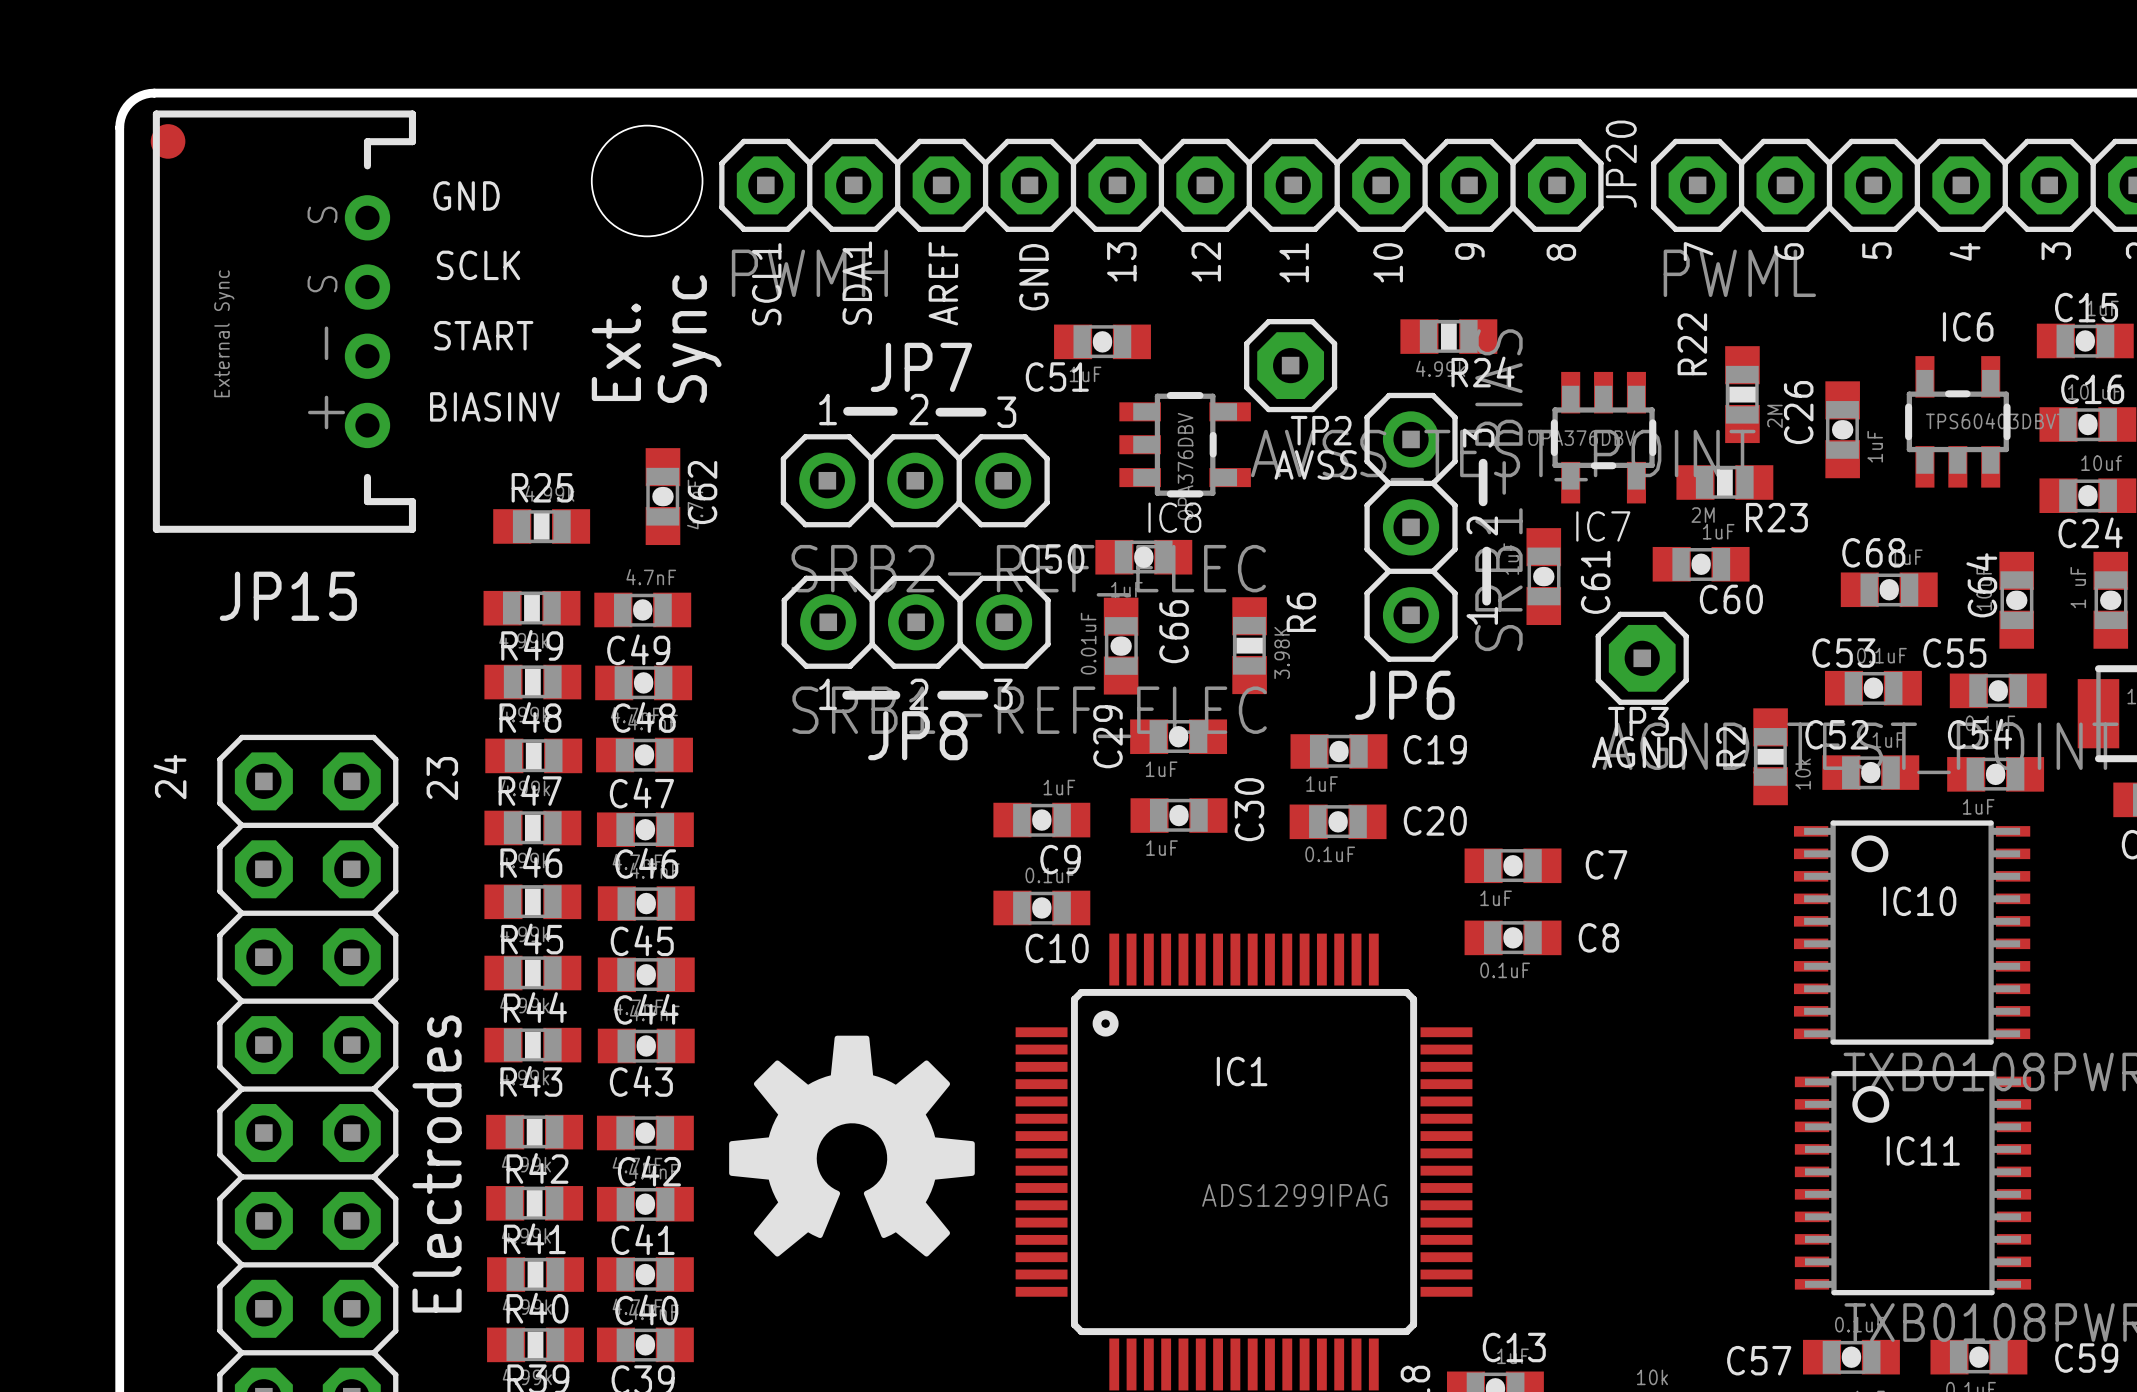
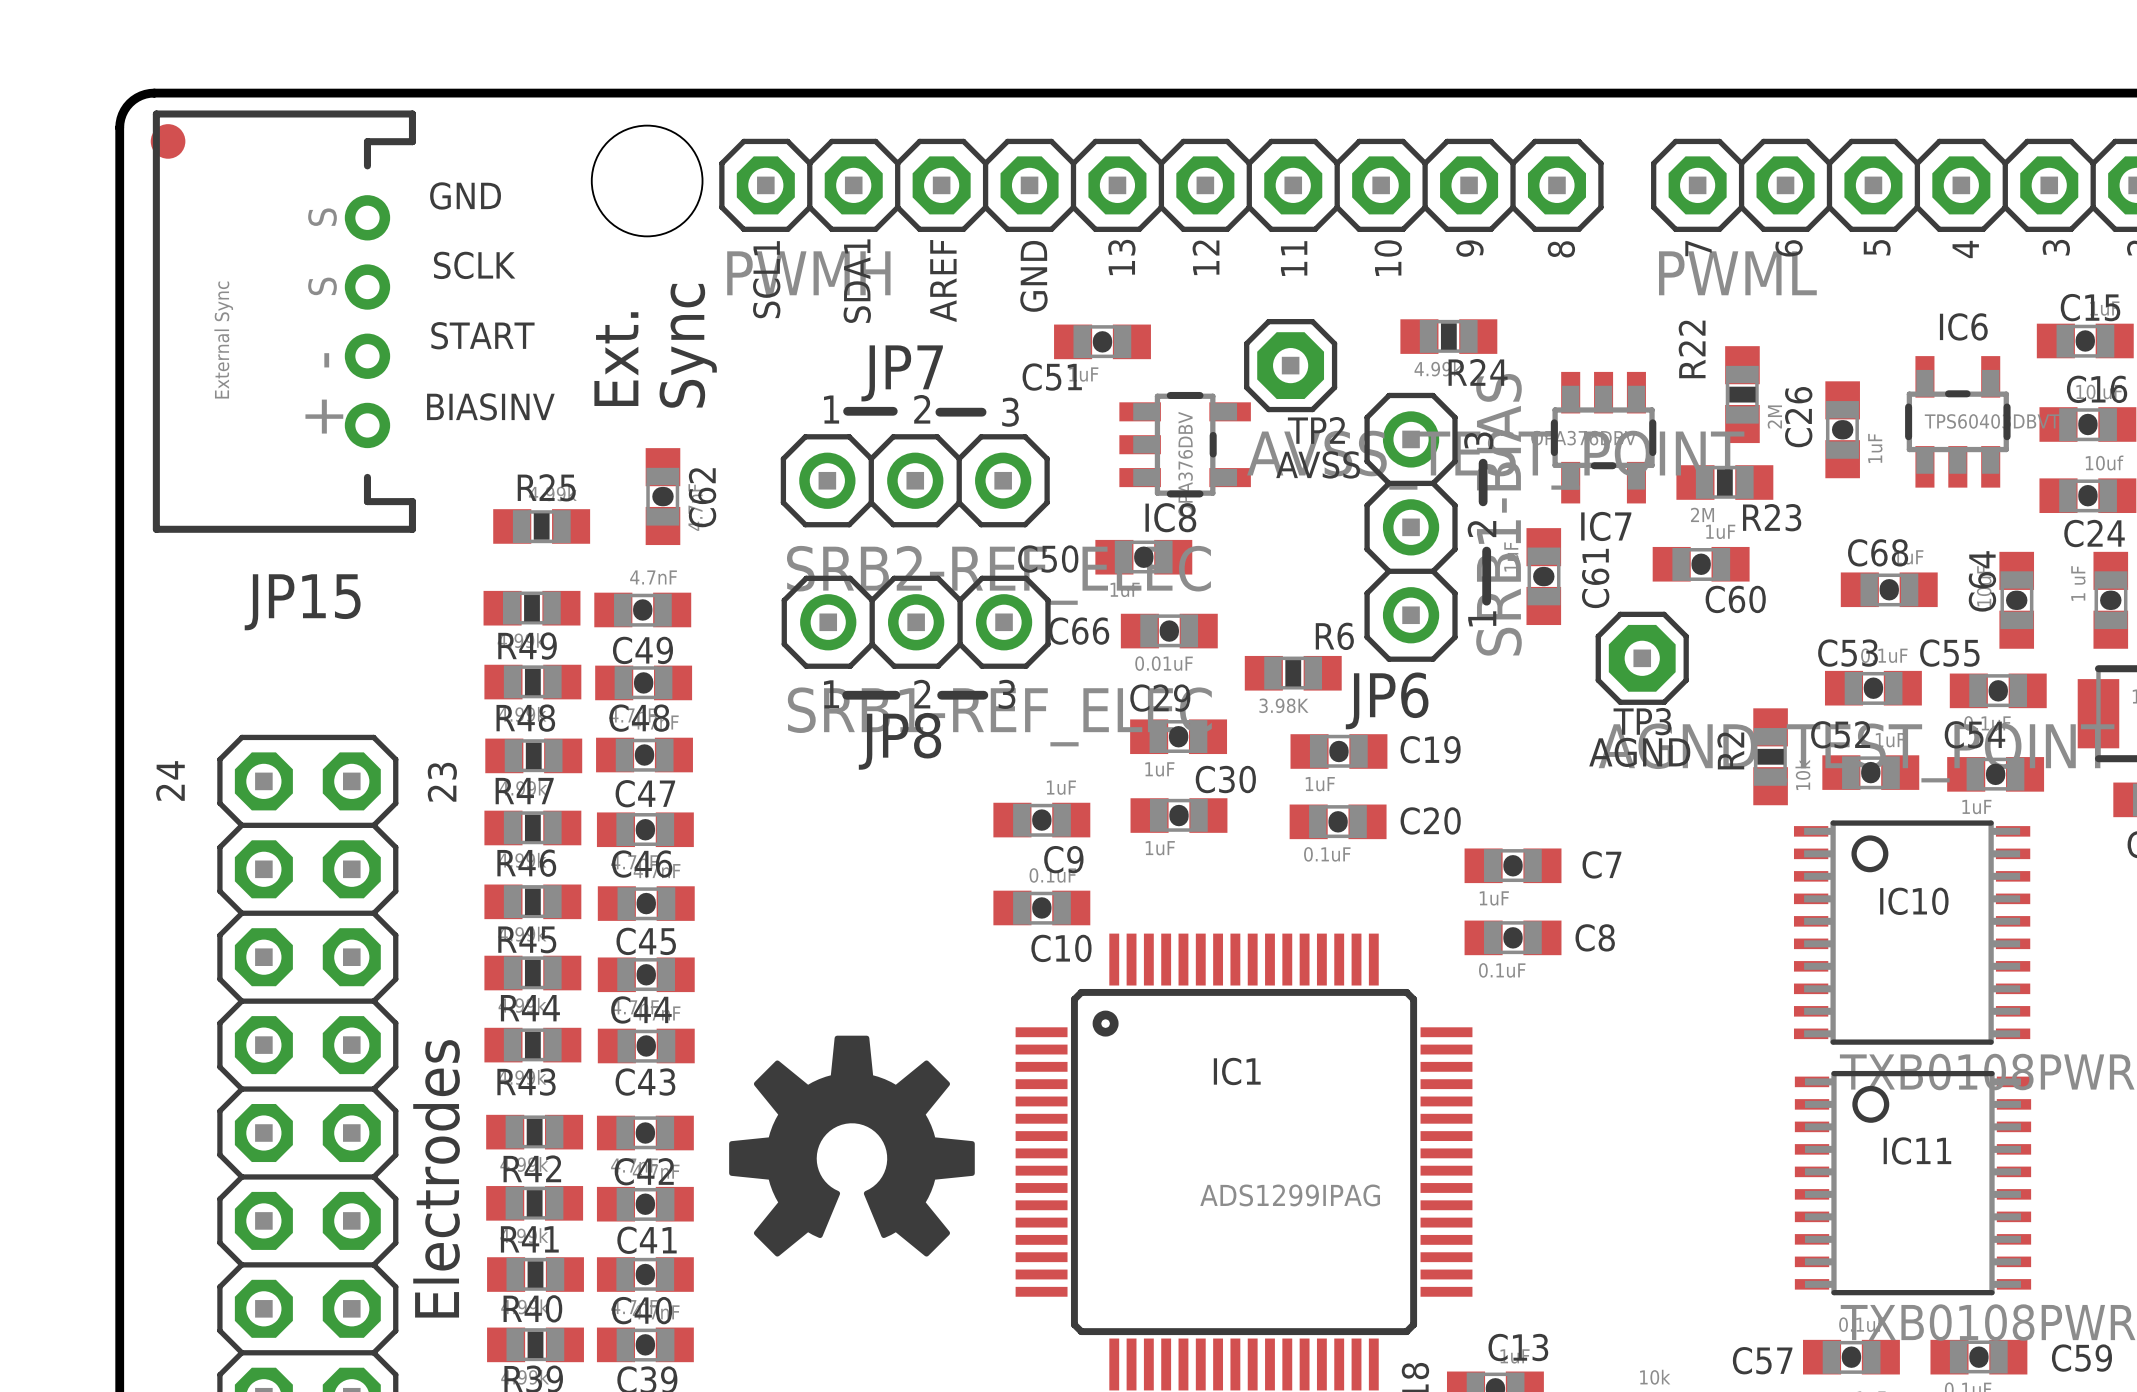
JP20 name: JP20 (1621, 164) -> none
C66 name position: C66 (1174, 631) -> C66 (1079, 631)
R6 rotation: 0° (1249, 645) -> 90° clockwise (1293, 673)
C66 rotation: 0° (1121, 646) -> 90° clockwise (1169, 631)
C29 name rotation: 0° (1107, 736) -> 90° clockwise (1160, 698)
C30 name rotation: 0° (1249, 809) -> 90° clockwise (1225, 779)

